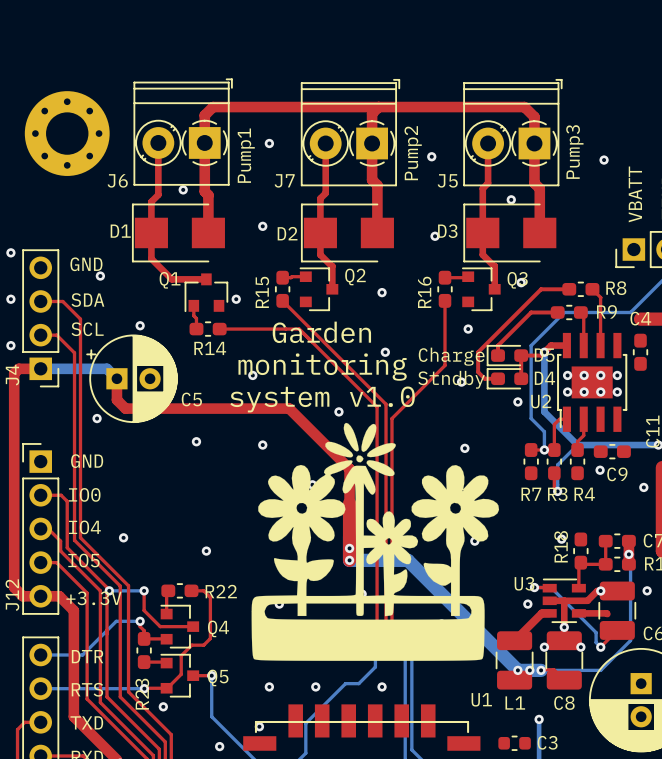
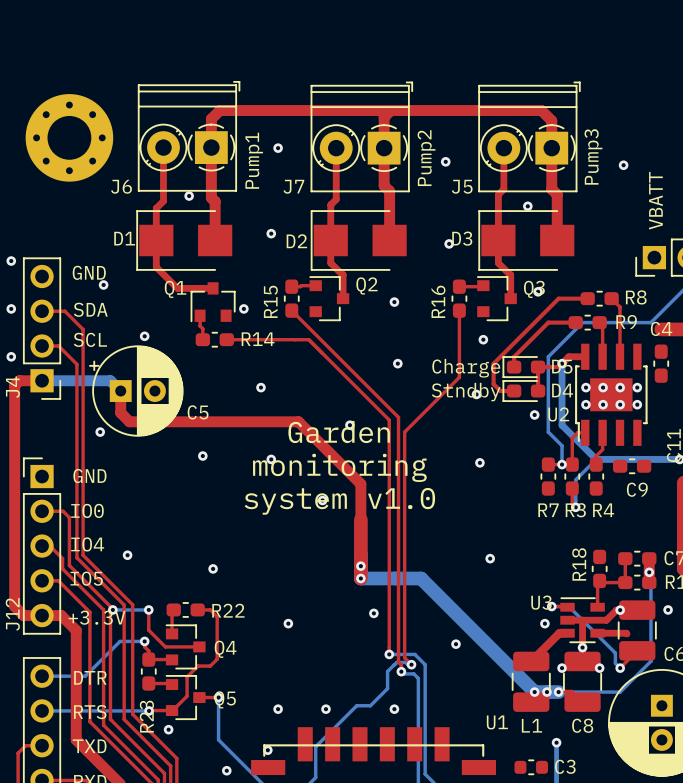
text position: Garden (321, 332) -> Garden (339, 432)
R14 name position: R14 (210, 348) -> R14 (258, 339)
text position: monitoring (322, 367) -> monitoring (339, 467)
text position: system v1.0 (322, 399) -> system v1.0 (339, 501)
drawing: [251, 422, 500, 661] -> none
via: (600, 470) -> none
via: (643, 487) -> none
via: (561, 539) -> none

